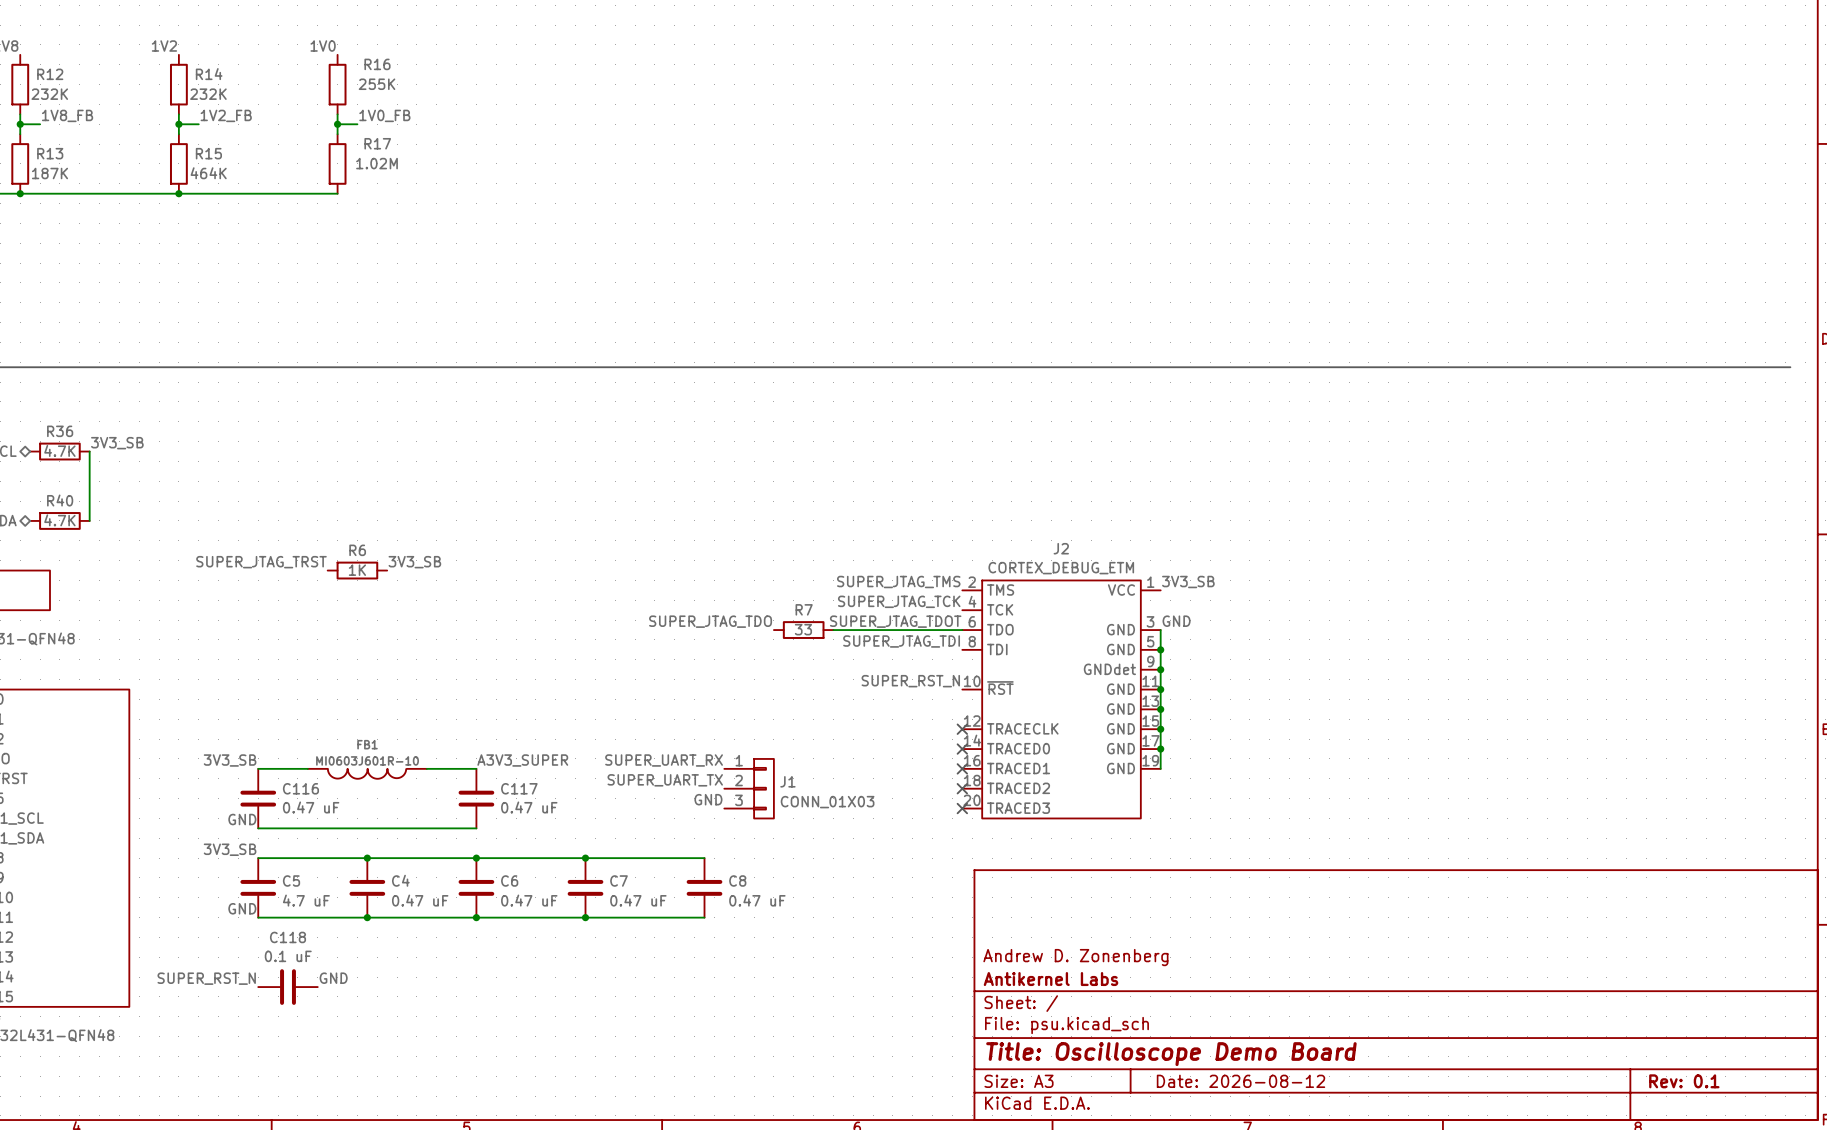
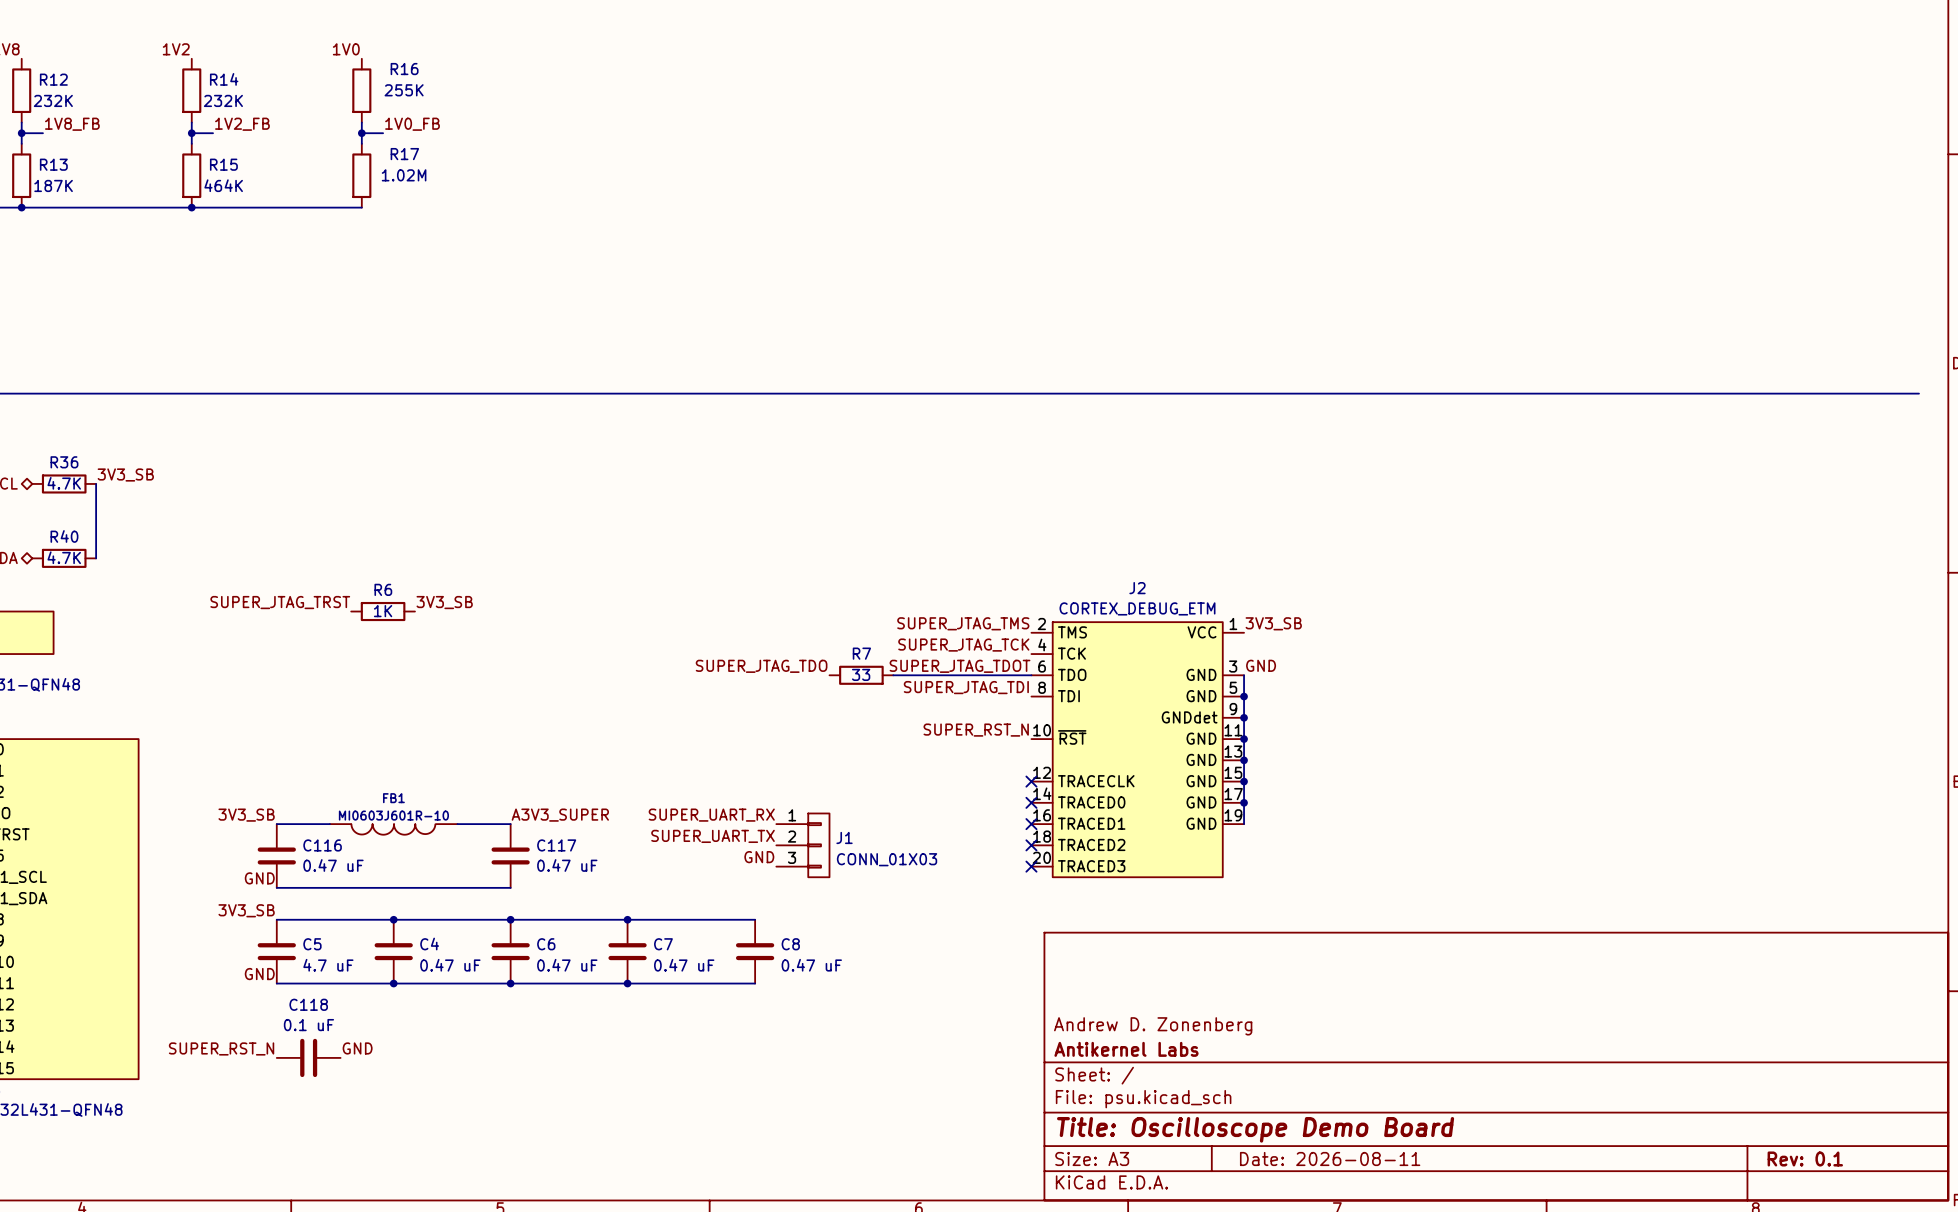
title block: Date: 2026-08-12 (1240, 1081) -> Date: 2026-08-11 (1330, 1158)

